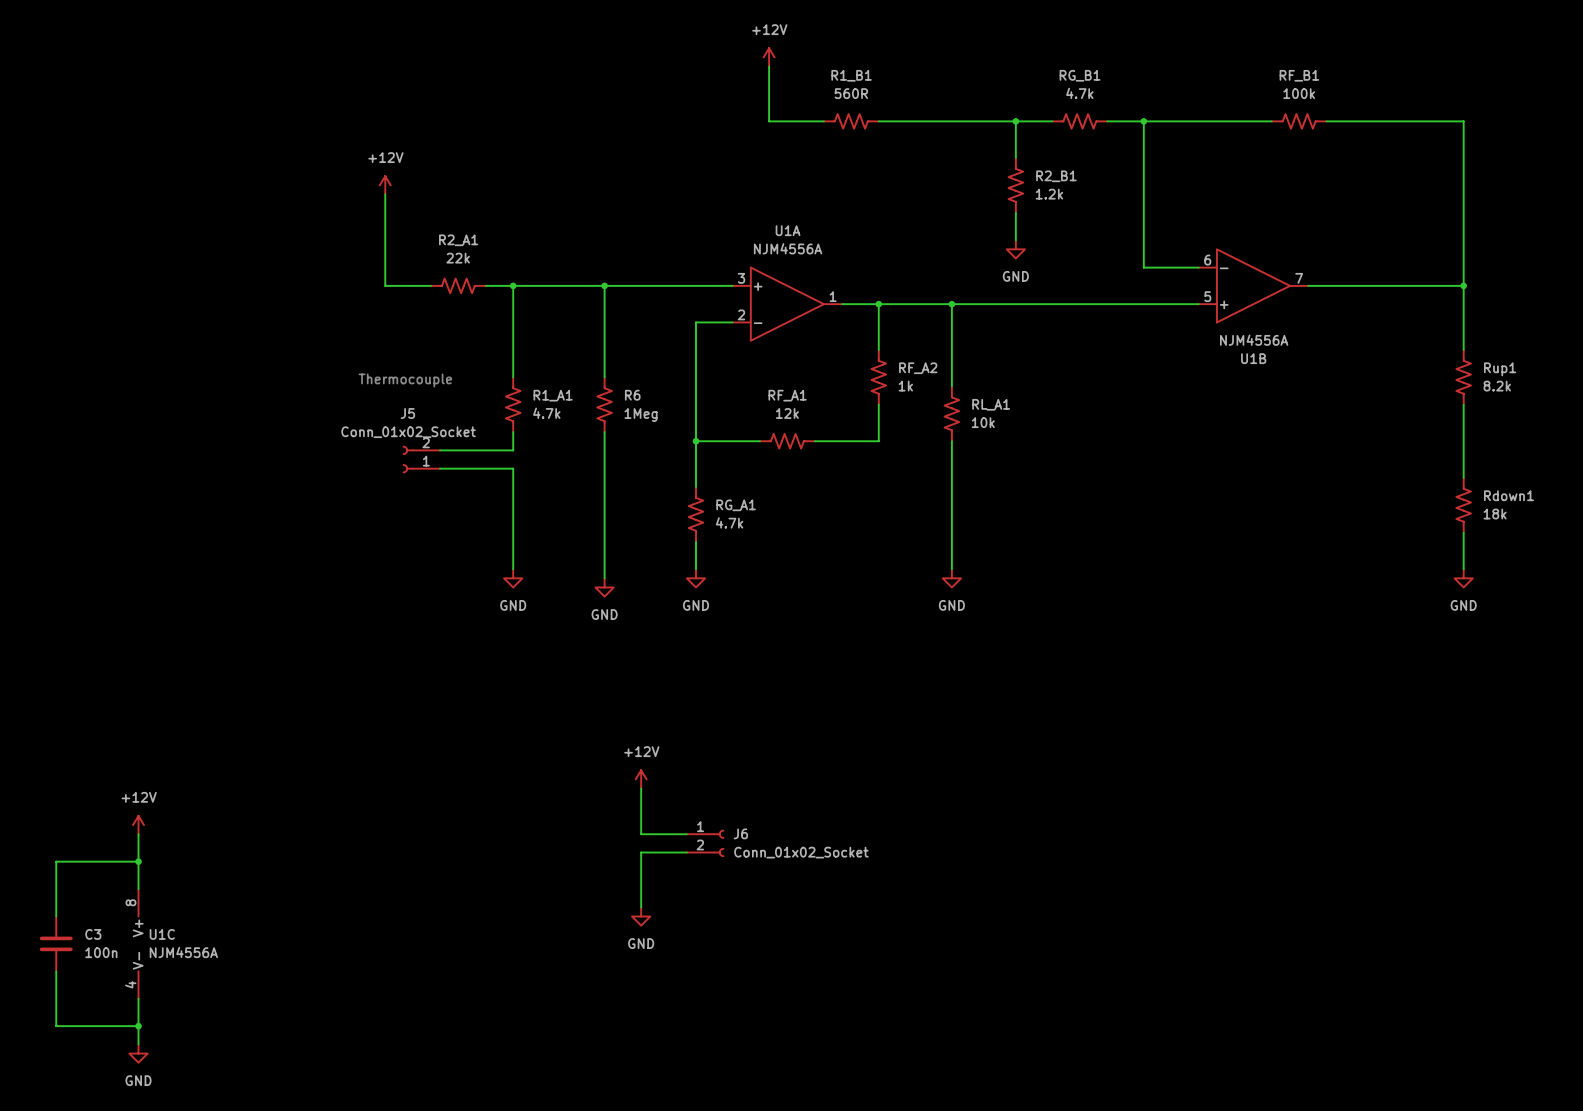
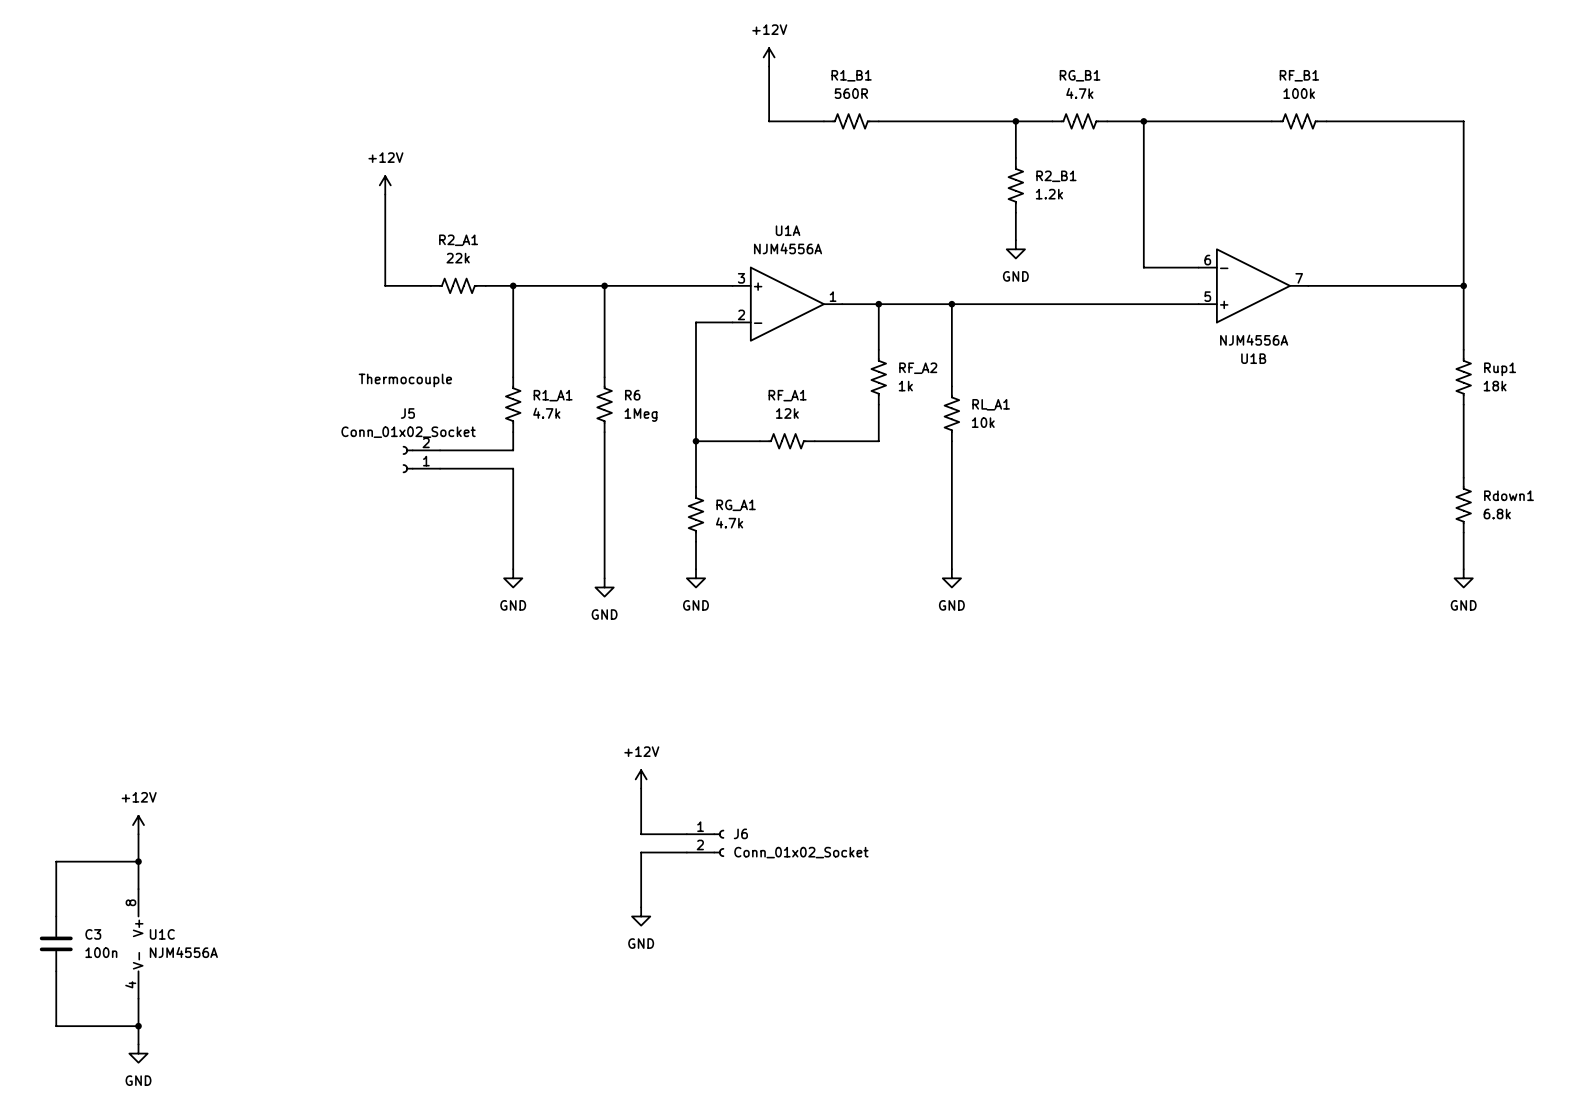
Rup1 value: 8.2k (1497, 386) -> 18k (1495, 386)
Rdown1 value: 18k (1495, 514) -> 6.8k (1497, 514)

